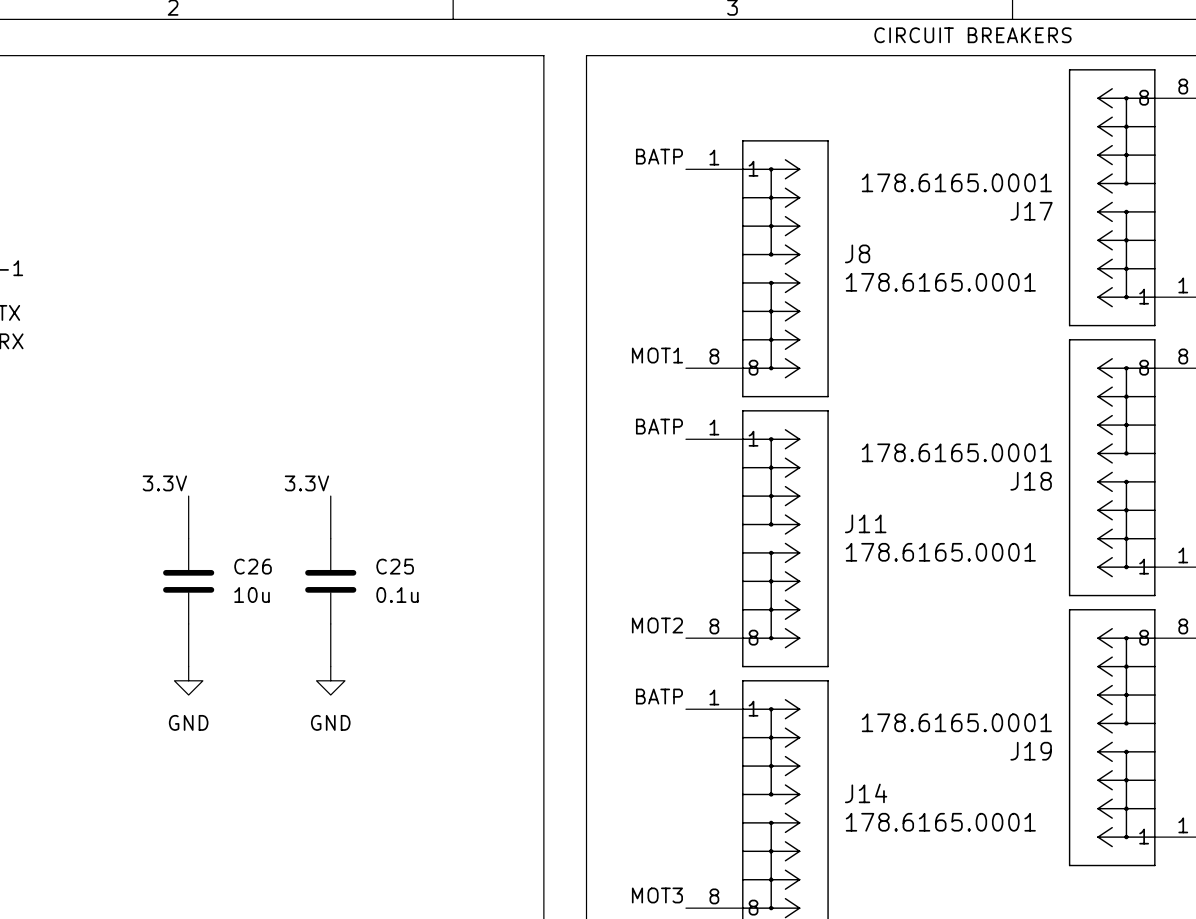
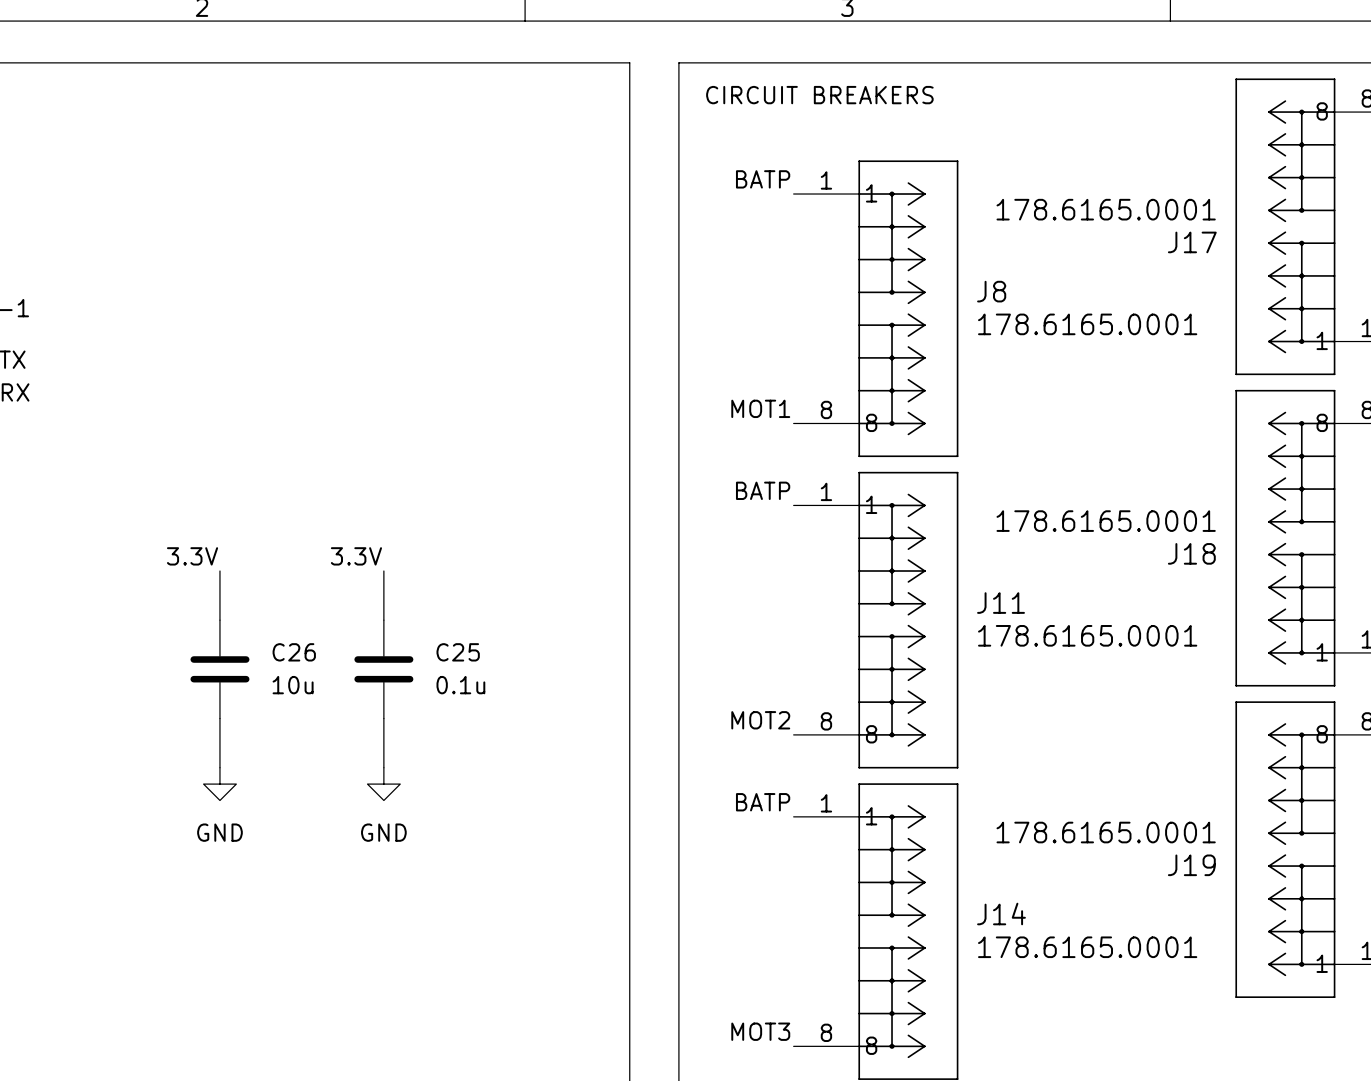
text position: CIRCUIT BREAKERS (972, 35) -> CIRCUIT BREAKERS (819, 95)

